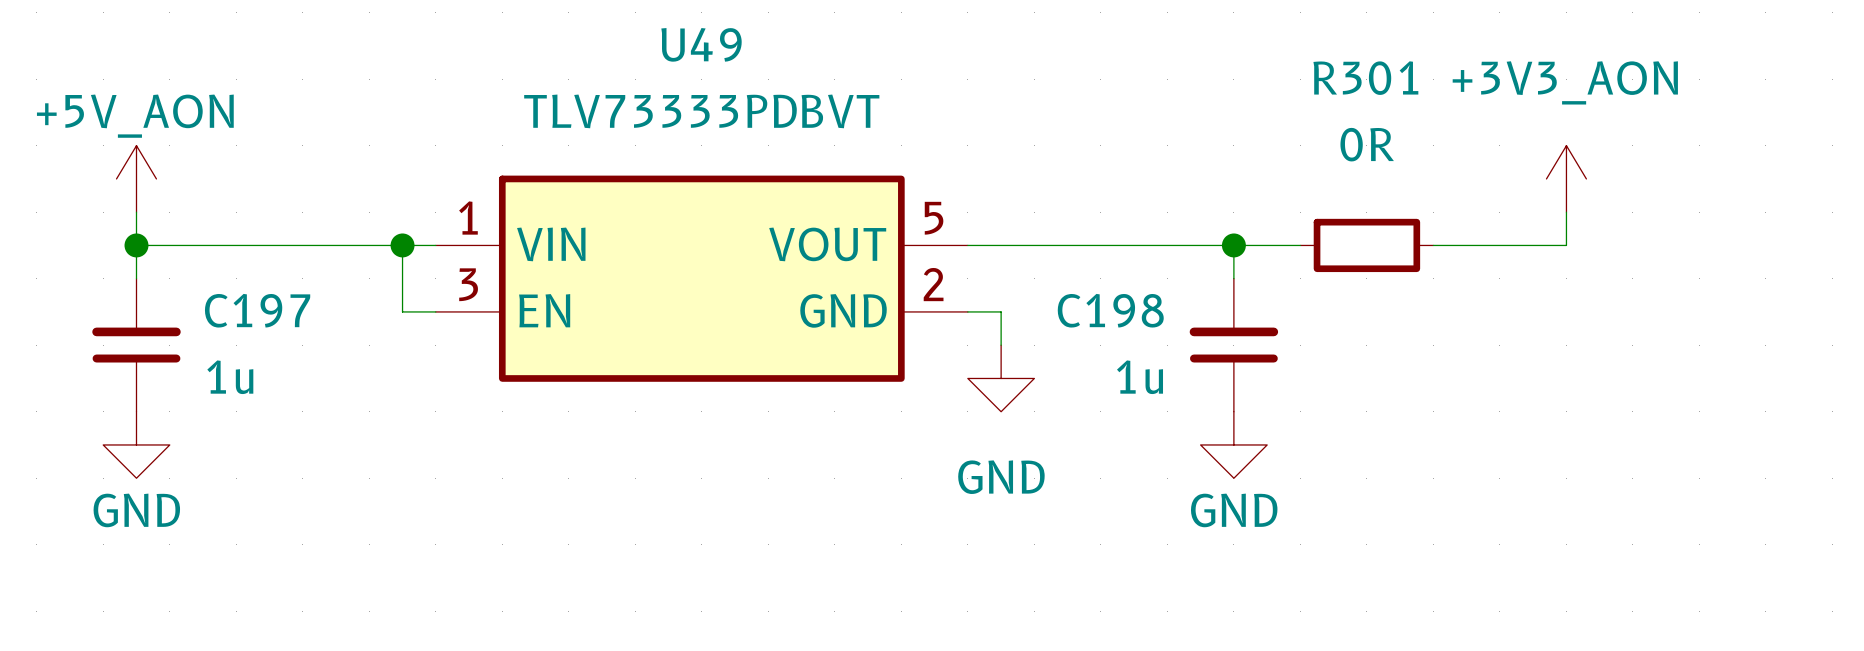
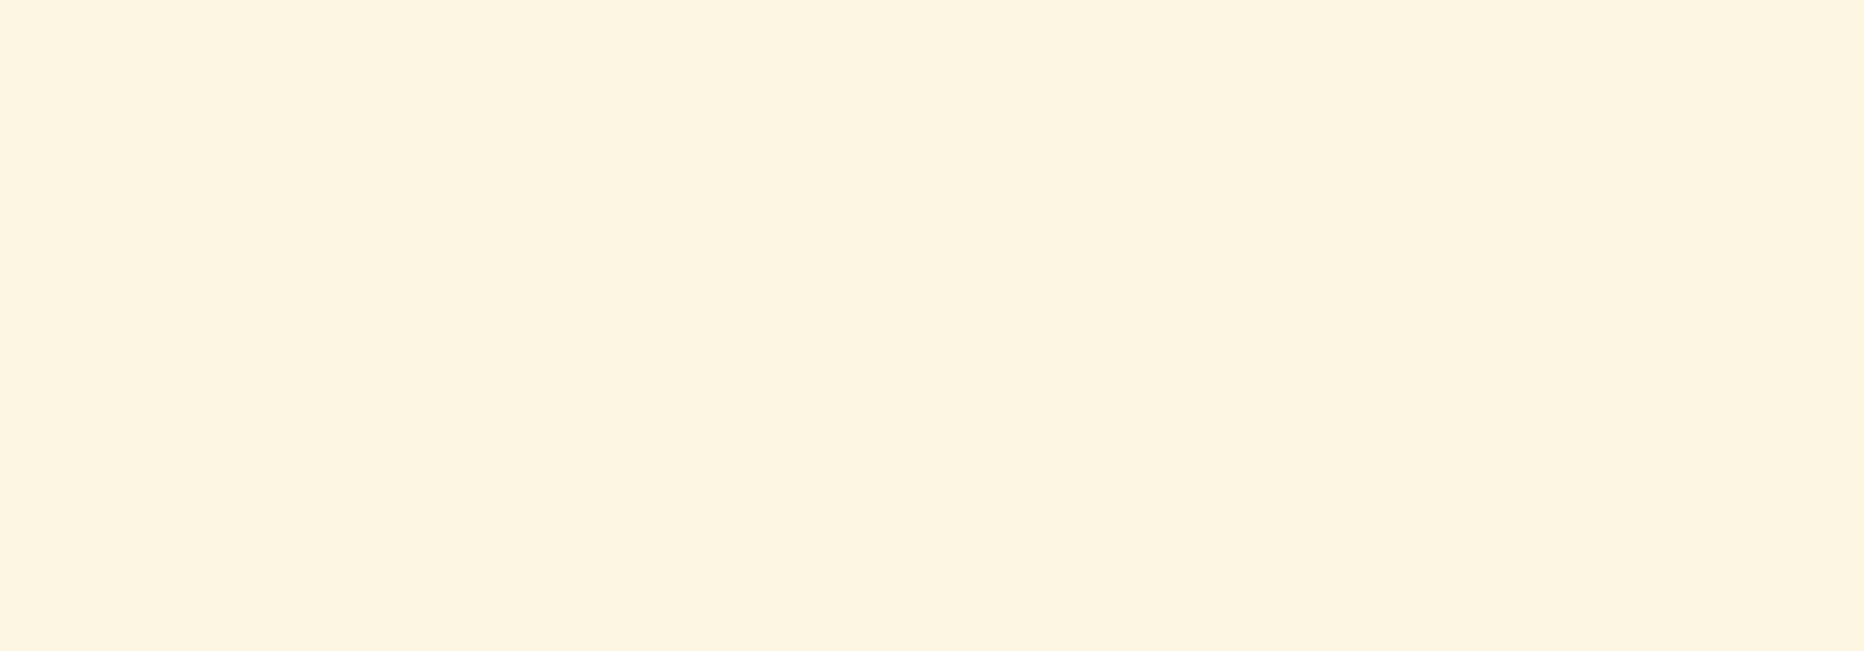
power symbol: +5V_AON (136, 178) -> none
power symbol: +3V3_AON (1566, 178) -> none
wire: (136, 212) (136, 278) -> none
wire: (1566, 212) (1566, 245) (1433, 245) -> none
wire: (136, 245) (435, 245) -> none
junction: (136, 245) -> none
wire: (402, 245) (402, 311) (435, 311) -> none
junction: (402, 245) -> none
wire: (967, 245) (1300, 245) -> none
wire: (1233, 245) (1233, 278) -> none
junction: (1233, 245) -> none
R301: (1366, 245) -> none
U49: (701, 278) -> none
wire: (967, 311) (1001, 311) (1001, 345) -> none
C197: (136, 345) -> none
C198: (1233, 345) -> none
power symbol: GND (1001, 378) -> none
power symbol: GND (136, 444) -> none
power symbol: GND (1233, 444) -> none

